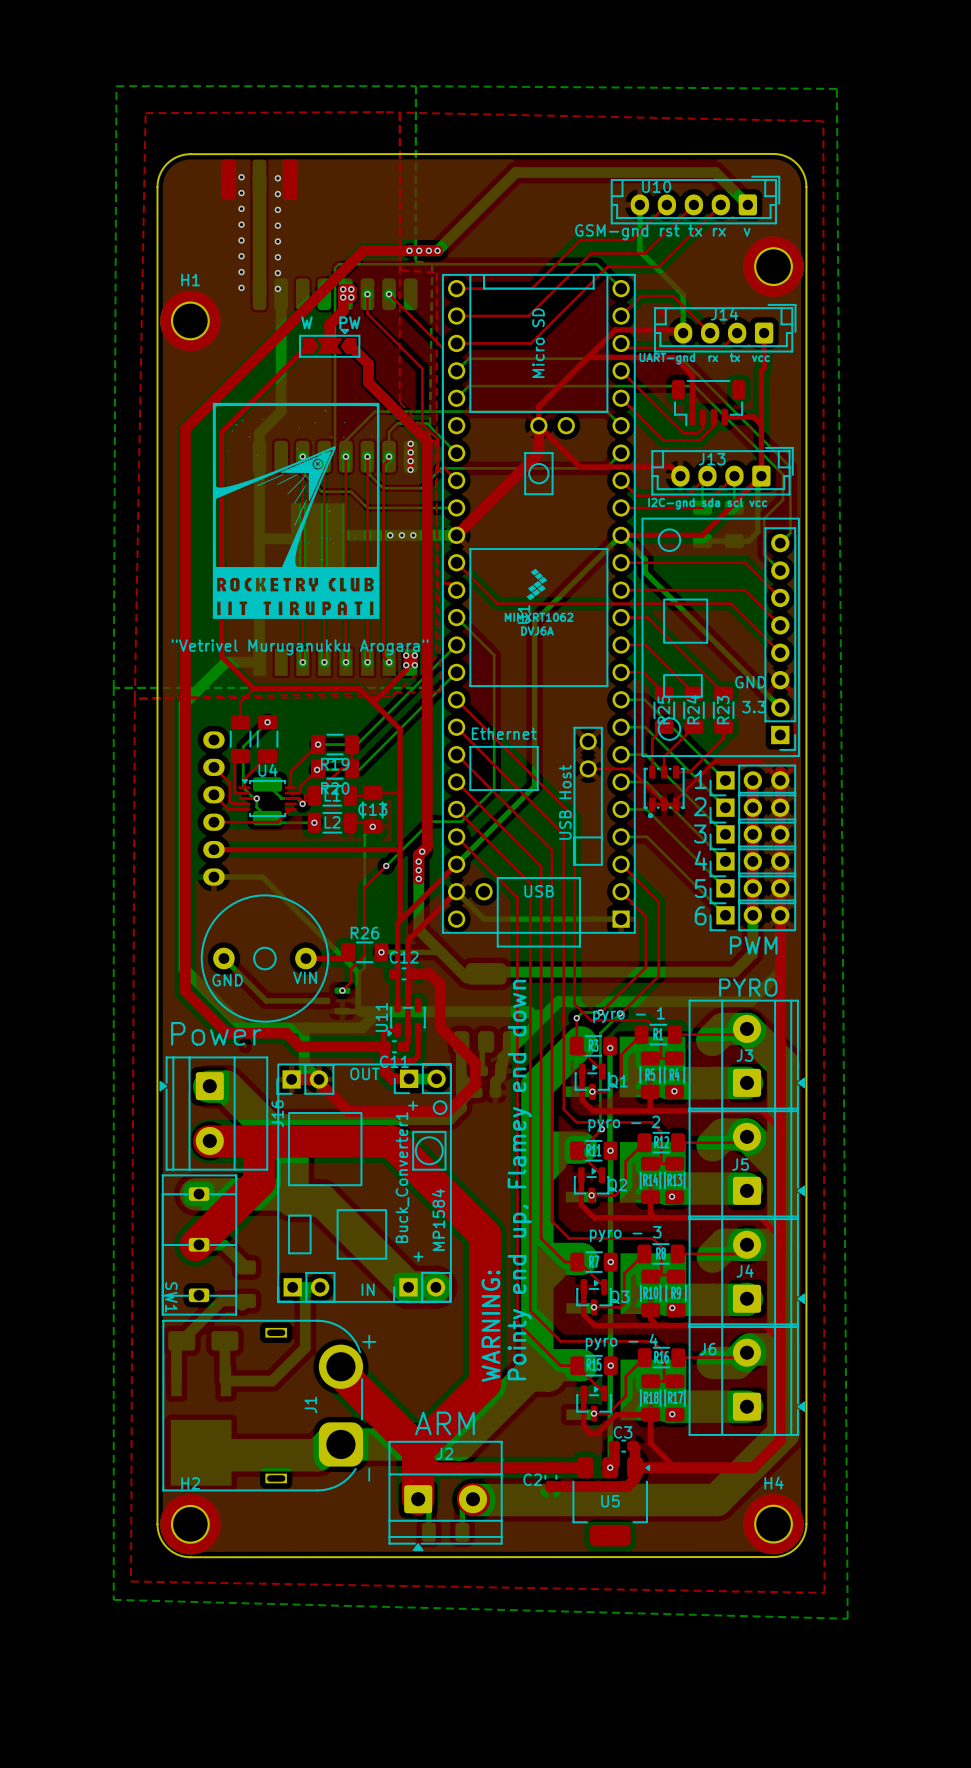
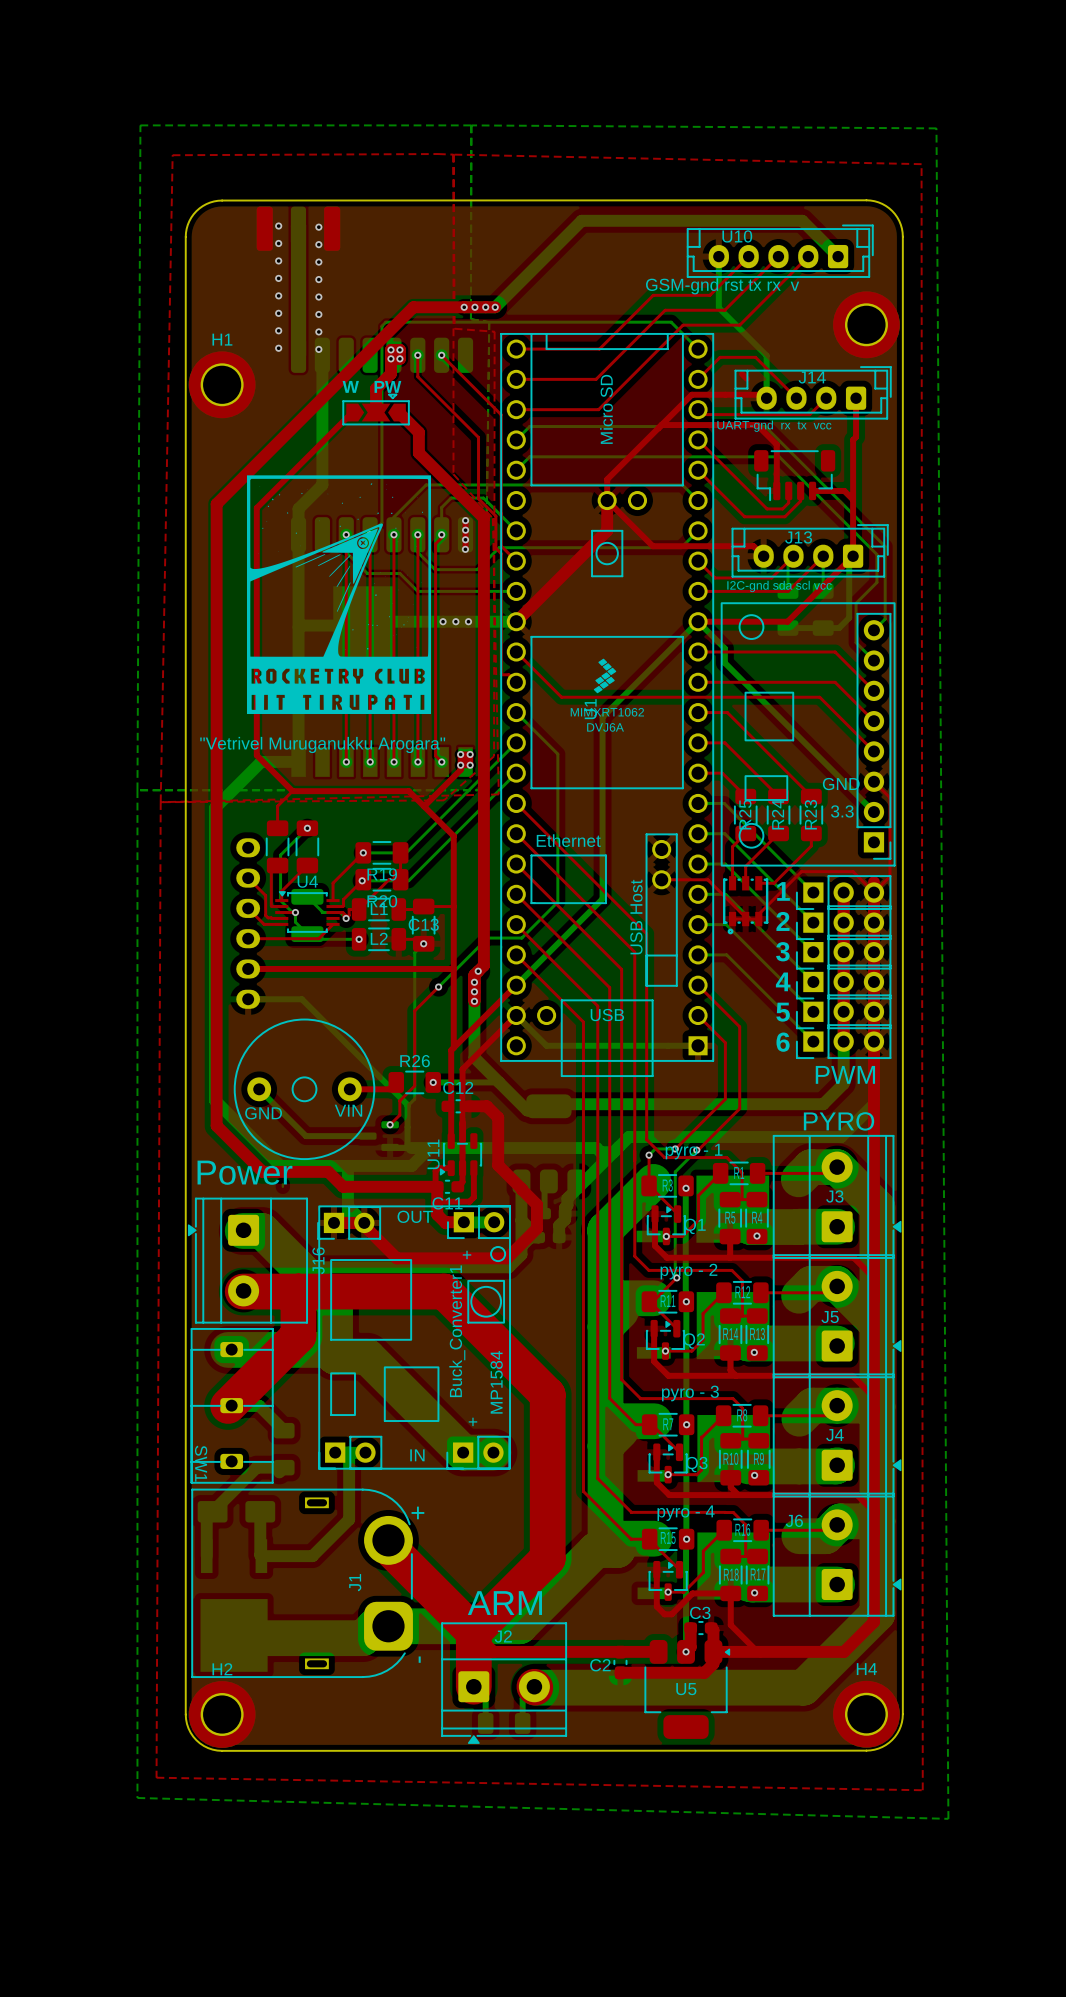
text: Pointy end up, Flamey end down (519, 1180) -> none
text: WARNING: (490, 1326) -> none

